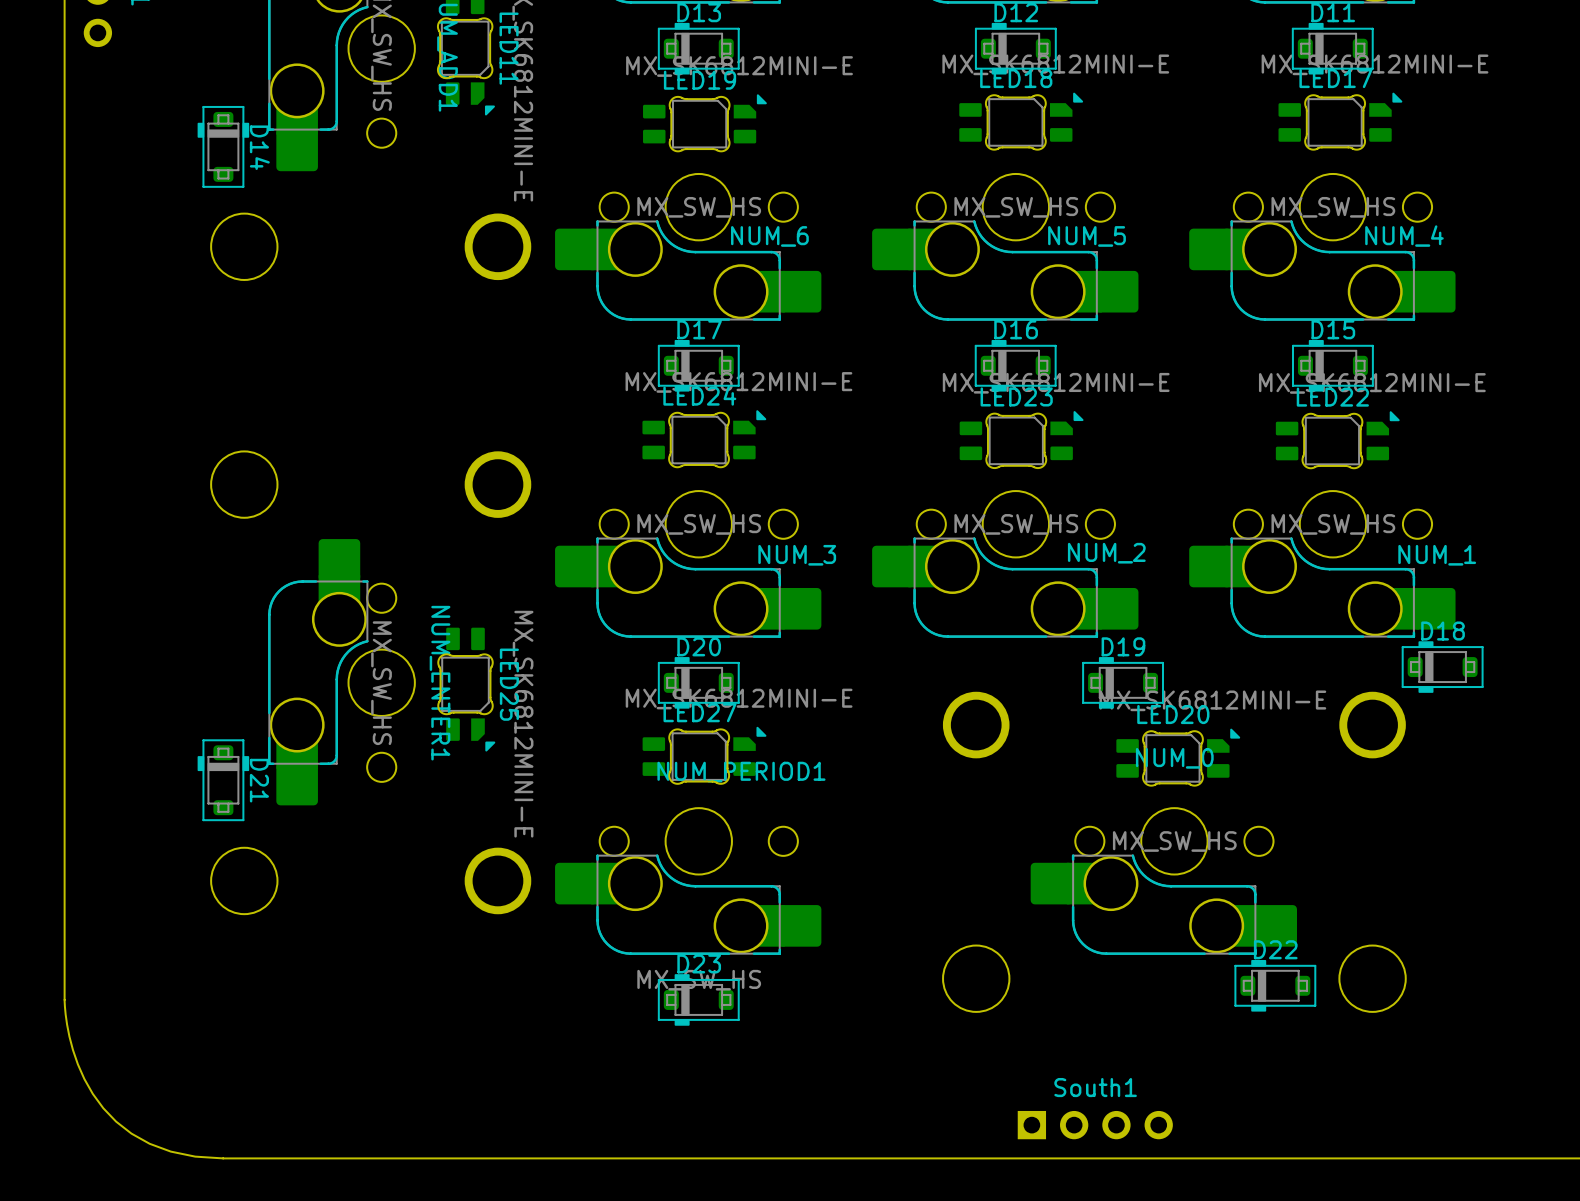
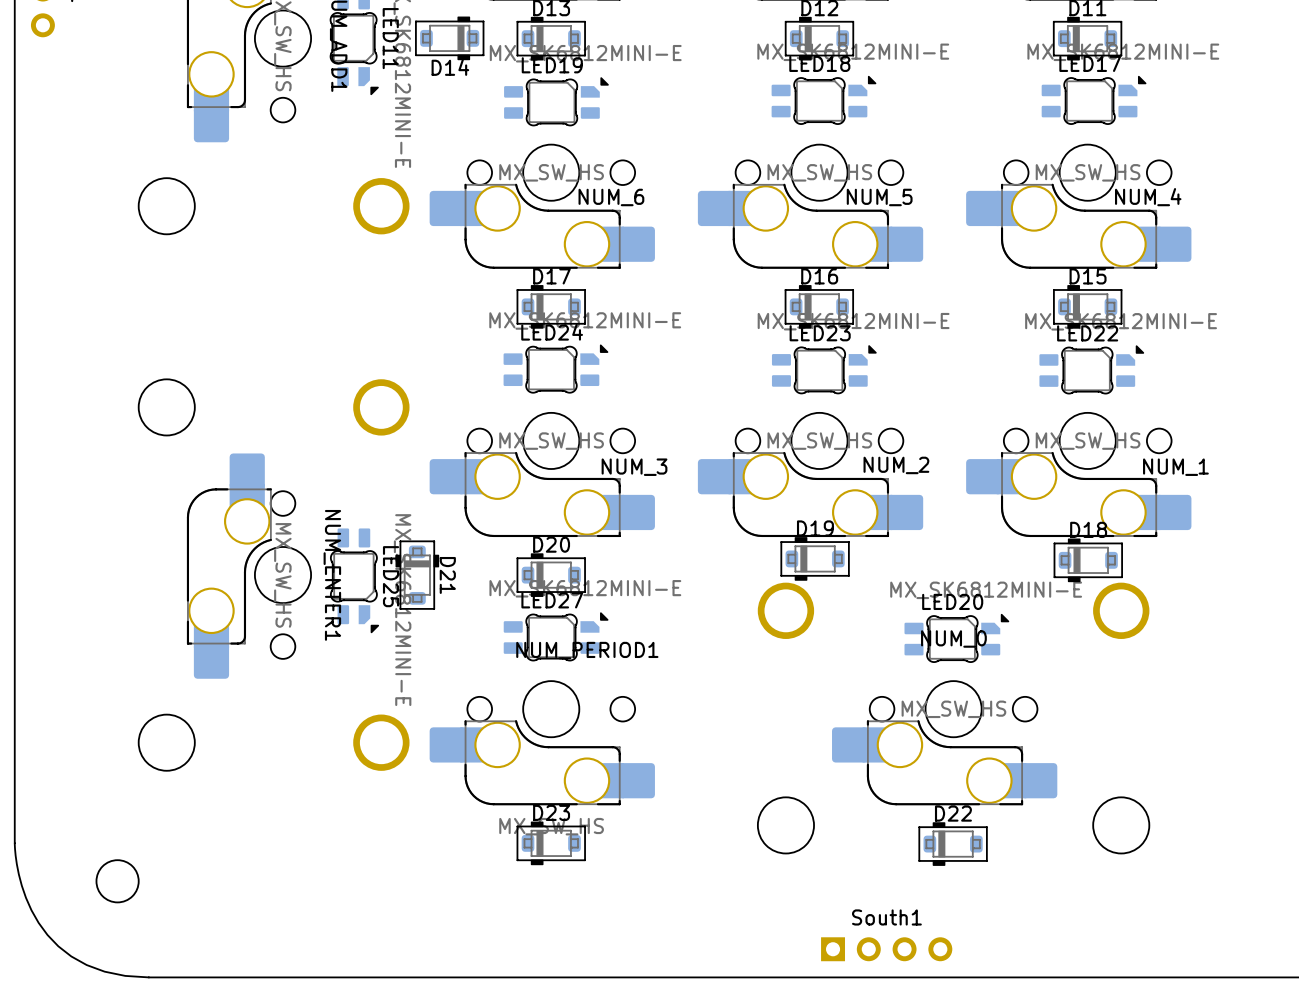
D14 rotation: 0° (223, 146) -> 90° clockwise (449, 38)
D14 position: (223, 146) -> (449, 38)
D18 position: (1442, 667) -> (1088, 560)
D19 position: (1123, 682) -> (815, 558)
D21 position: (223, 780) -> (417, 575)
D22 position: (1275, 985) -> (953, 844)
round board edge: none -> [96, 859, 140, 903]

